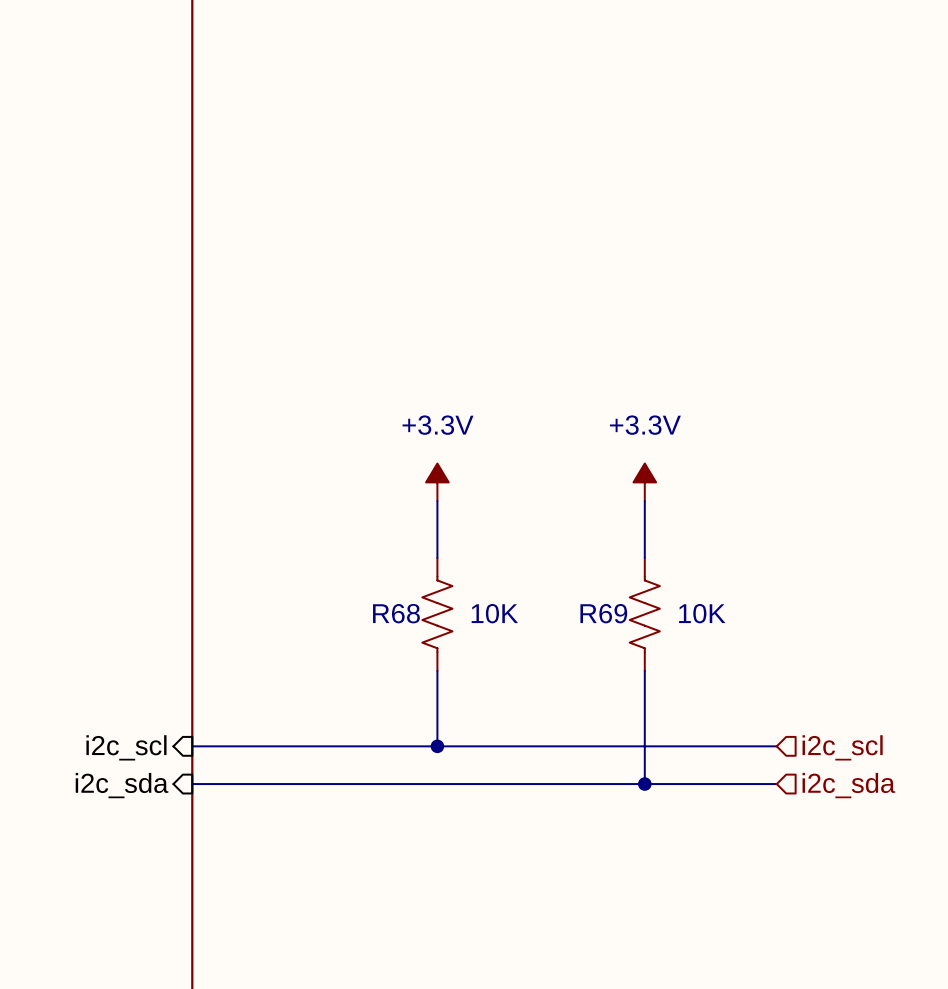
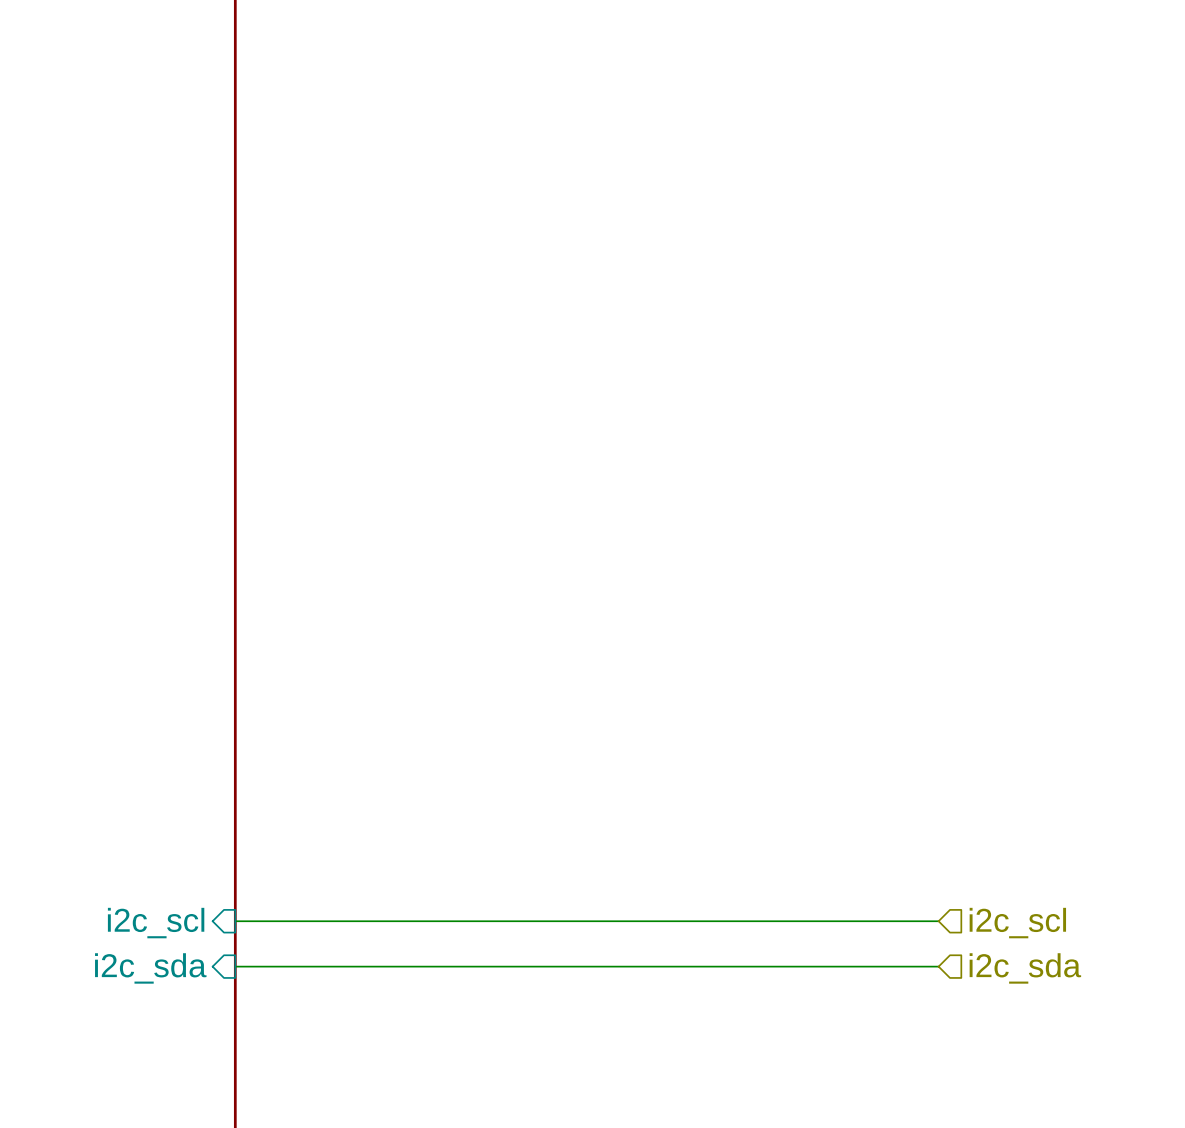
power symbol: +3.3V (437, 482) -> none
power symbol: +3.3V (644, 482) -> none
wire: (437, 501) (437, 557) -> none
wire: (644, 501) (644, 557) -> none
R68: 10K (437, 614) -> none
R69: 10K (644, 614) -> none
wire: (437, 670) (437, 746) -> none
wire: (644, 670) (644, 784) -> none
junction: (437, 746) -> none
junction: (644, 784) -> none

